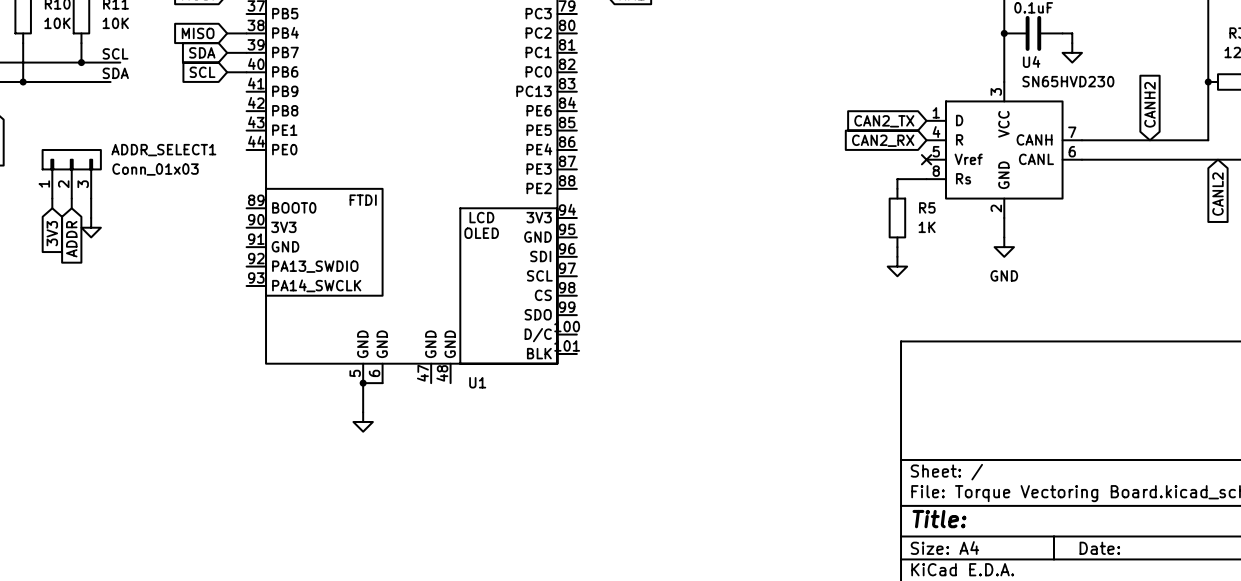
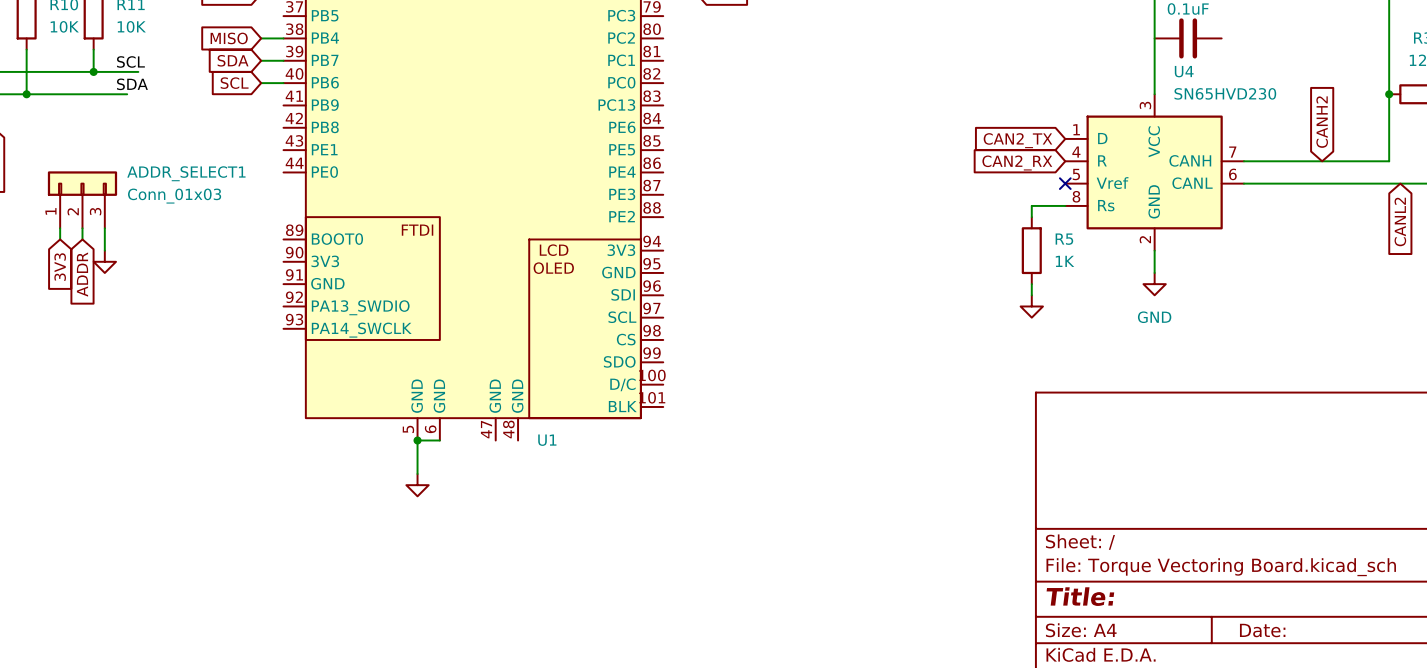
junction: (1004, 33) -> none
wire: (1062, 33) (1072, 33) (1072, 43) -> none
power symbol: (1072, 52) -> none

